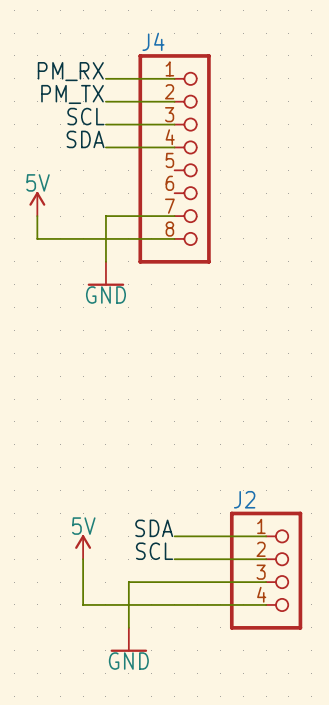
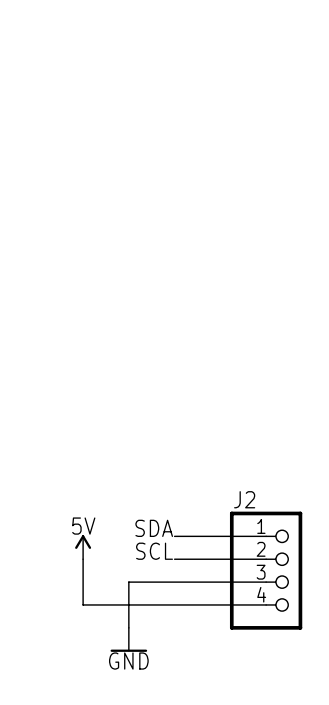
label: PM_RX (70, 71) -> none
wire: (105, 78) (174, 78) -> none
label: PM_TX (72, 94) -> none
wire: (105, 101) (174, 101) -> none
label: SCL (85, 116) -> none
wire: (105, 124) (174, 124) -> none
label: SDA (85, 139) -> none
wire: (105, 147) (174, 147) -> none
J4: (174, 158) -> none
power symbol: 5V (37, 204) -> none
wire: (37, 216) (37, 238) (174, 238) -> none
wire: (174, 216) (105, 216) (105, 261) -> none
power symbol: GND (105, 273) -> none

